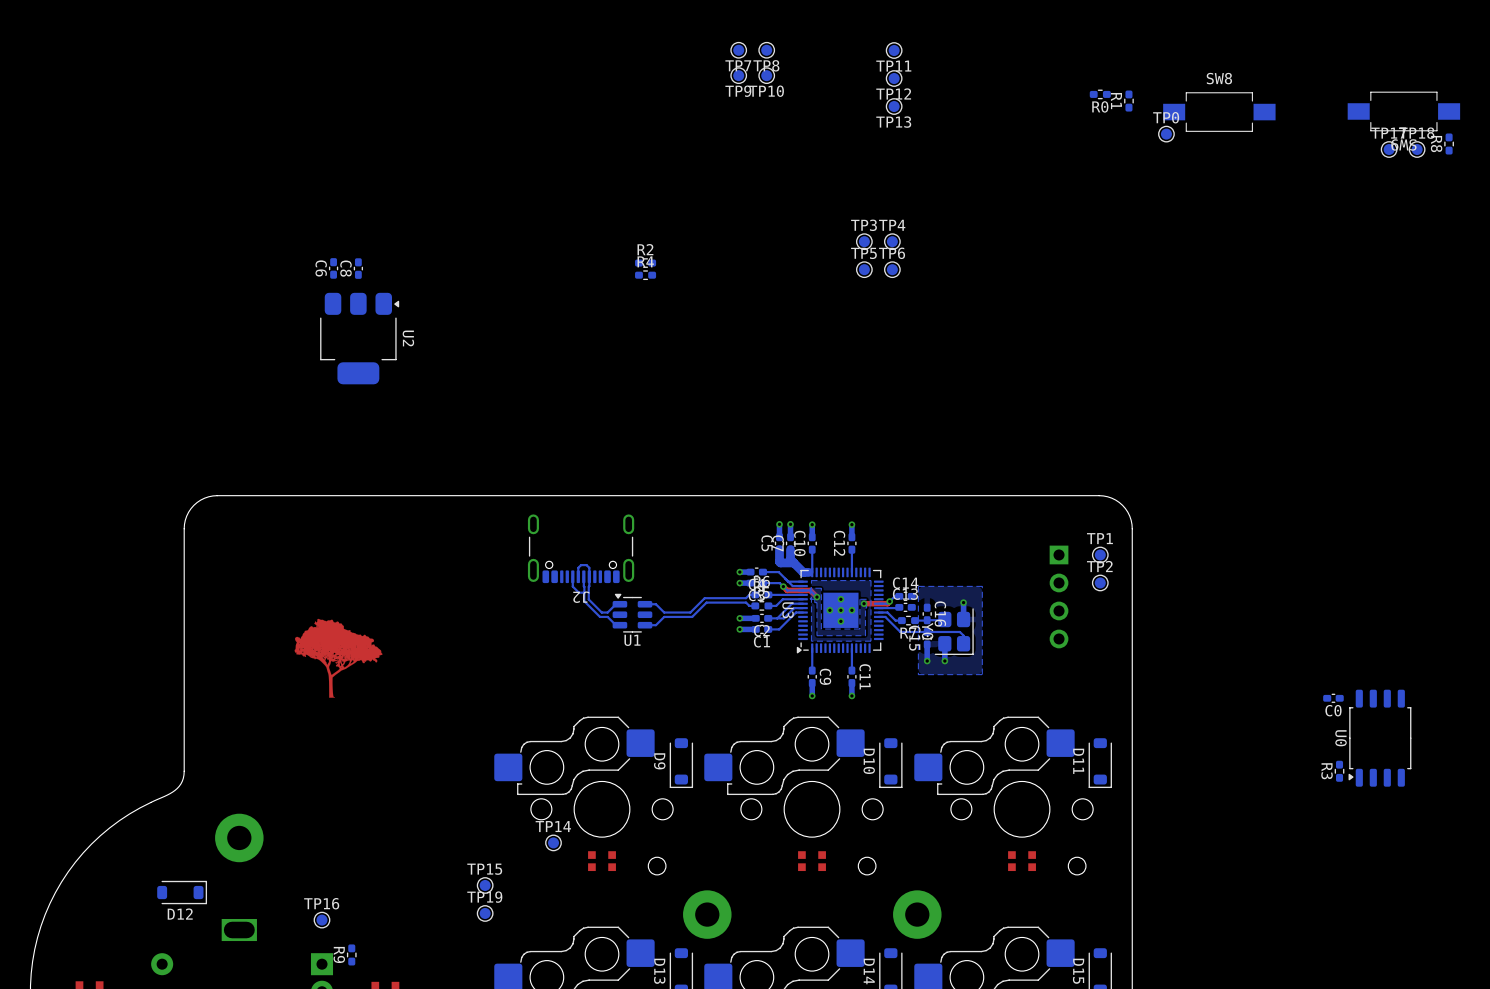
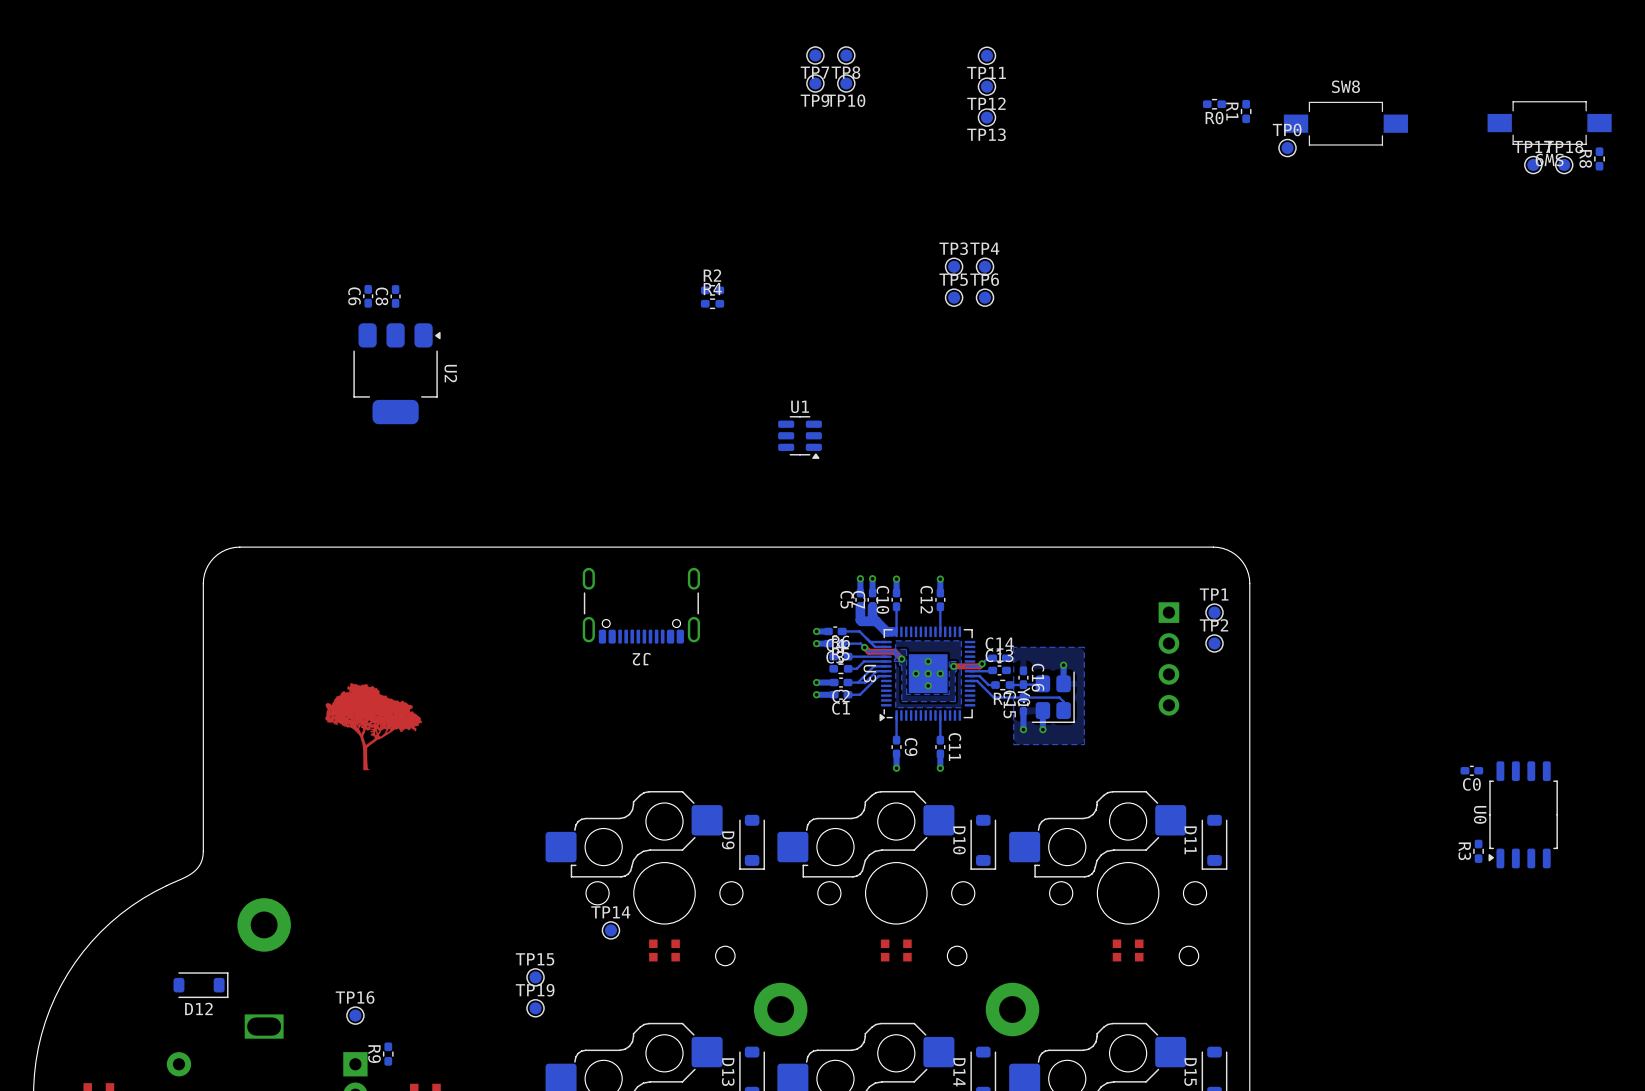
bottom track: (572, 576) (572, 586) (578, 592) (584, 592) -> none
bottom track: (578, 576) (578, 567) (581, 565) (586, 565) (589, 567) (588, 599) (601, 612) (607, 612) (615, 604) (619, 604) -> none
bottom track: (583, 576) (584, 601) (599, 616) (607, 616) (615, 625) (619, 625) -> none
bottom track: (755, 594) (749, 594) (746, 598) (704, 598) (690, 612) (664, 612) (655, 604) (645, 604) -> none
bottom track: (755, 605) (749, 605) (746, 602) (706, 602) (692, 616) (664, 616) (655, 625) (645, 625) -> none
U1 rotation: 0° (632, 613) -> 180° (800, 437)
U1 position: (632, 613) -> (800, 437)

